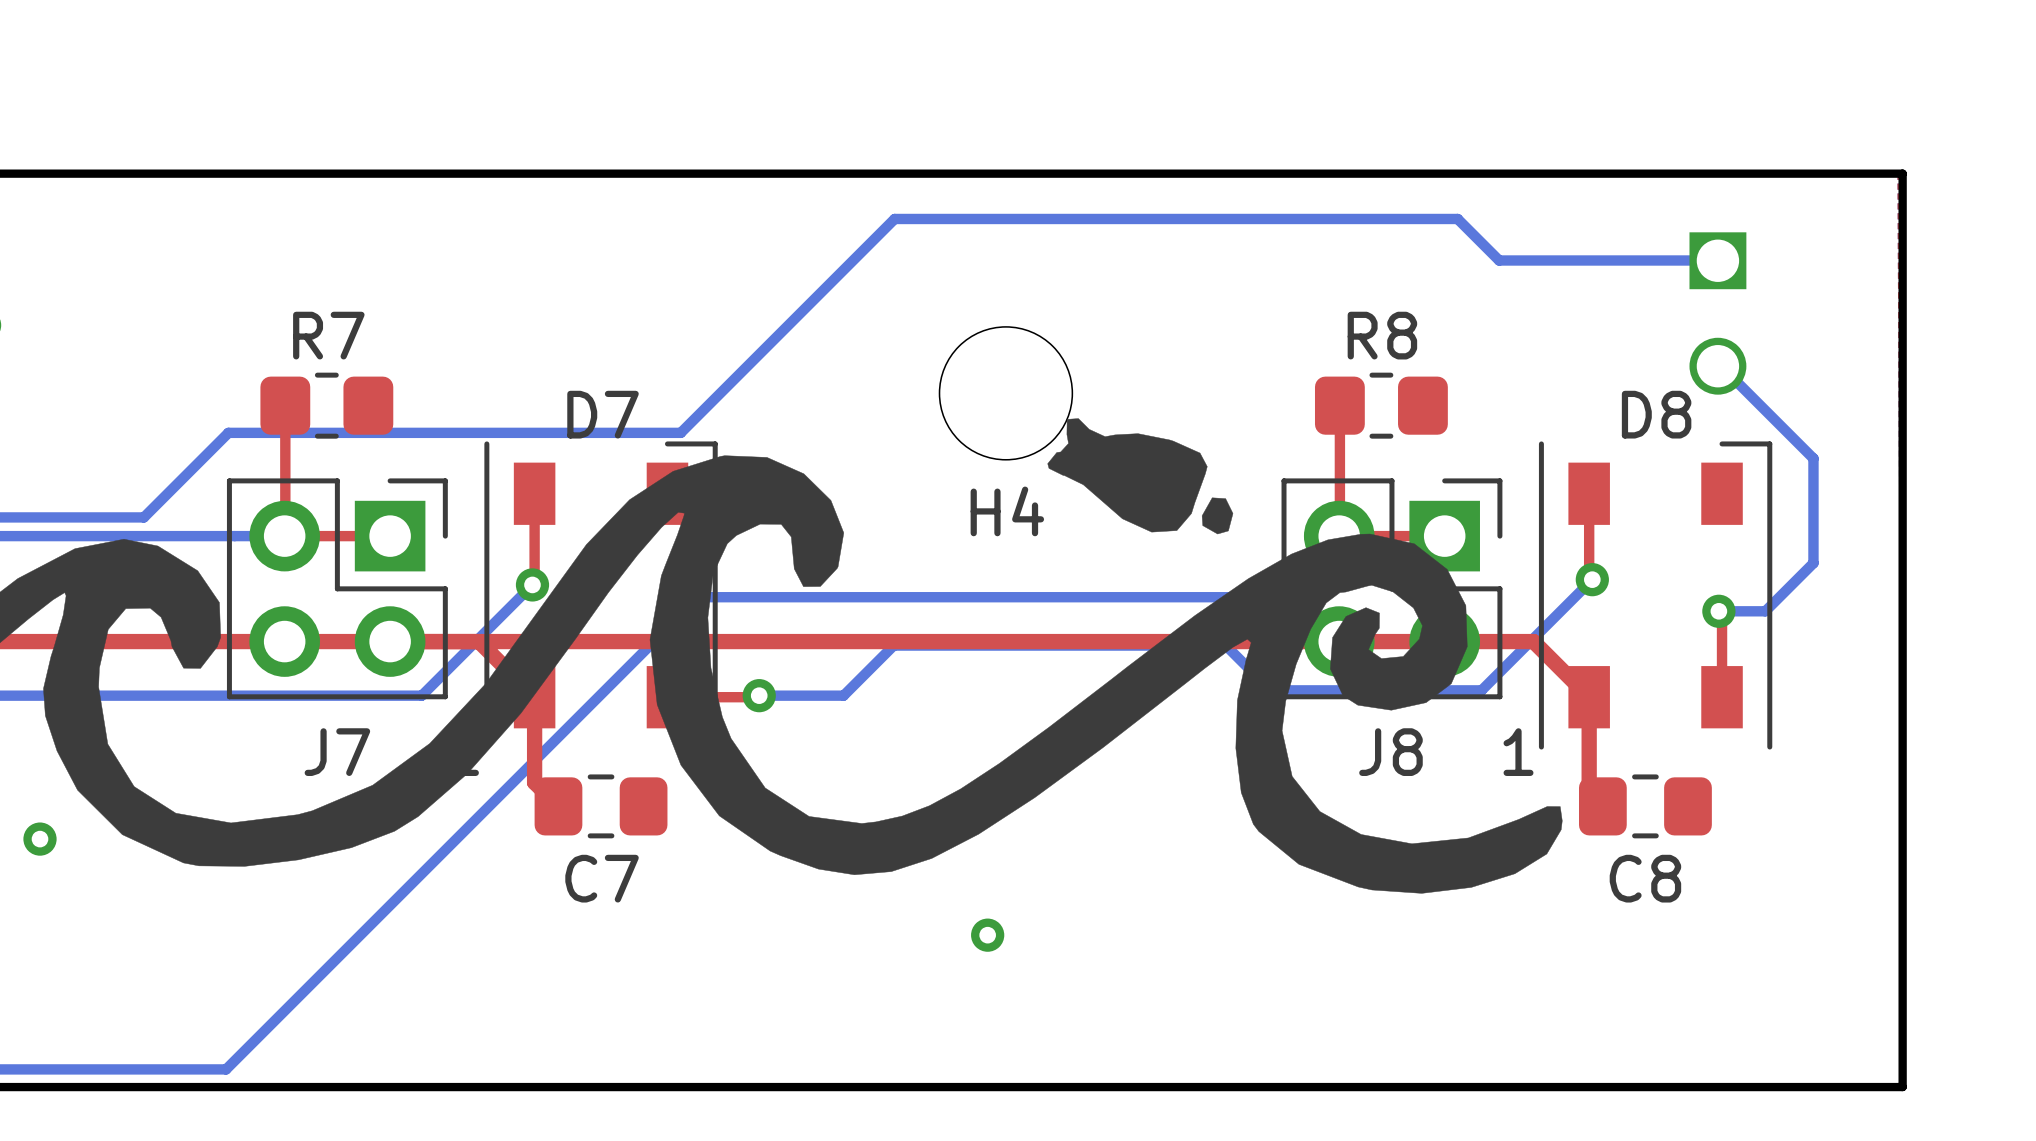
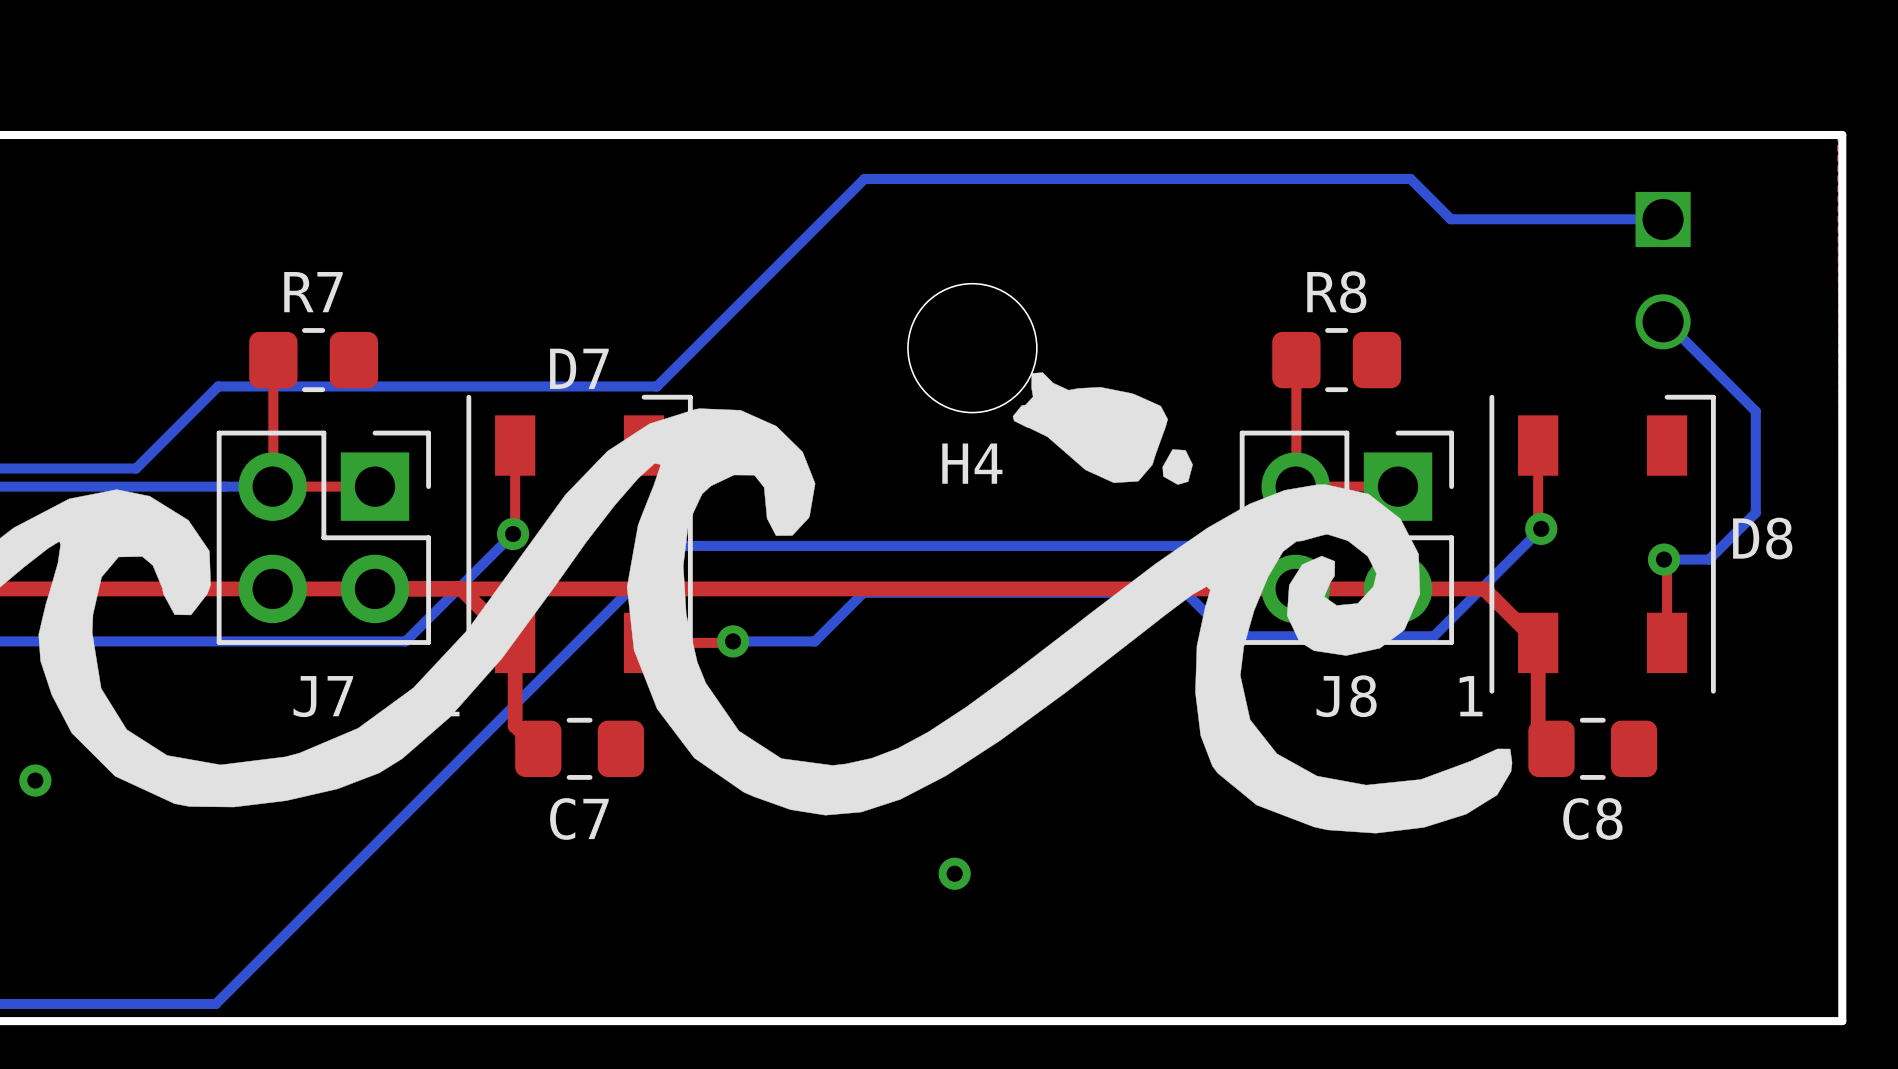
D8 name position: D8 (1656, 414) -> D8 (1762, 538)

